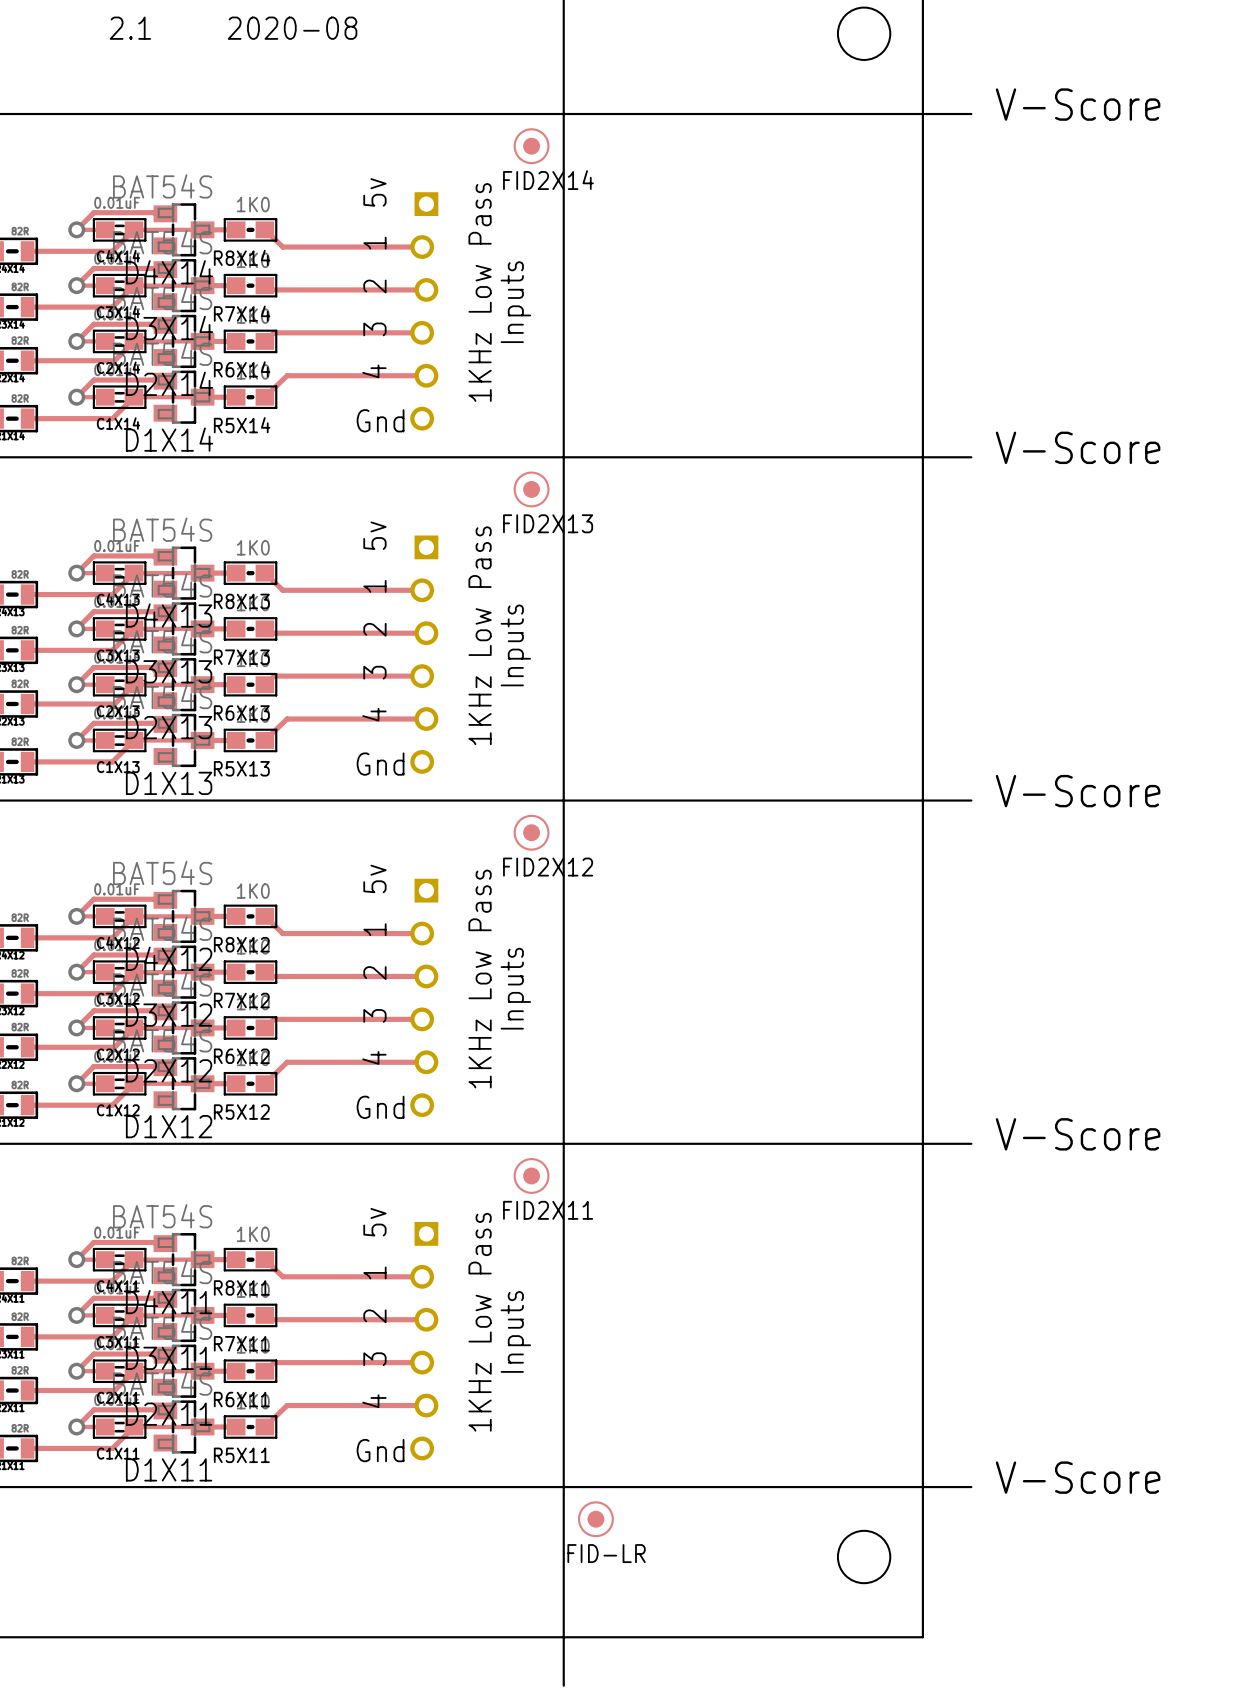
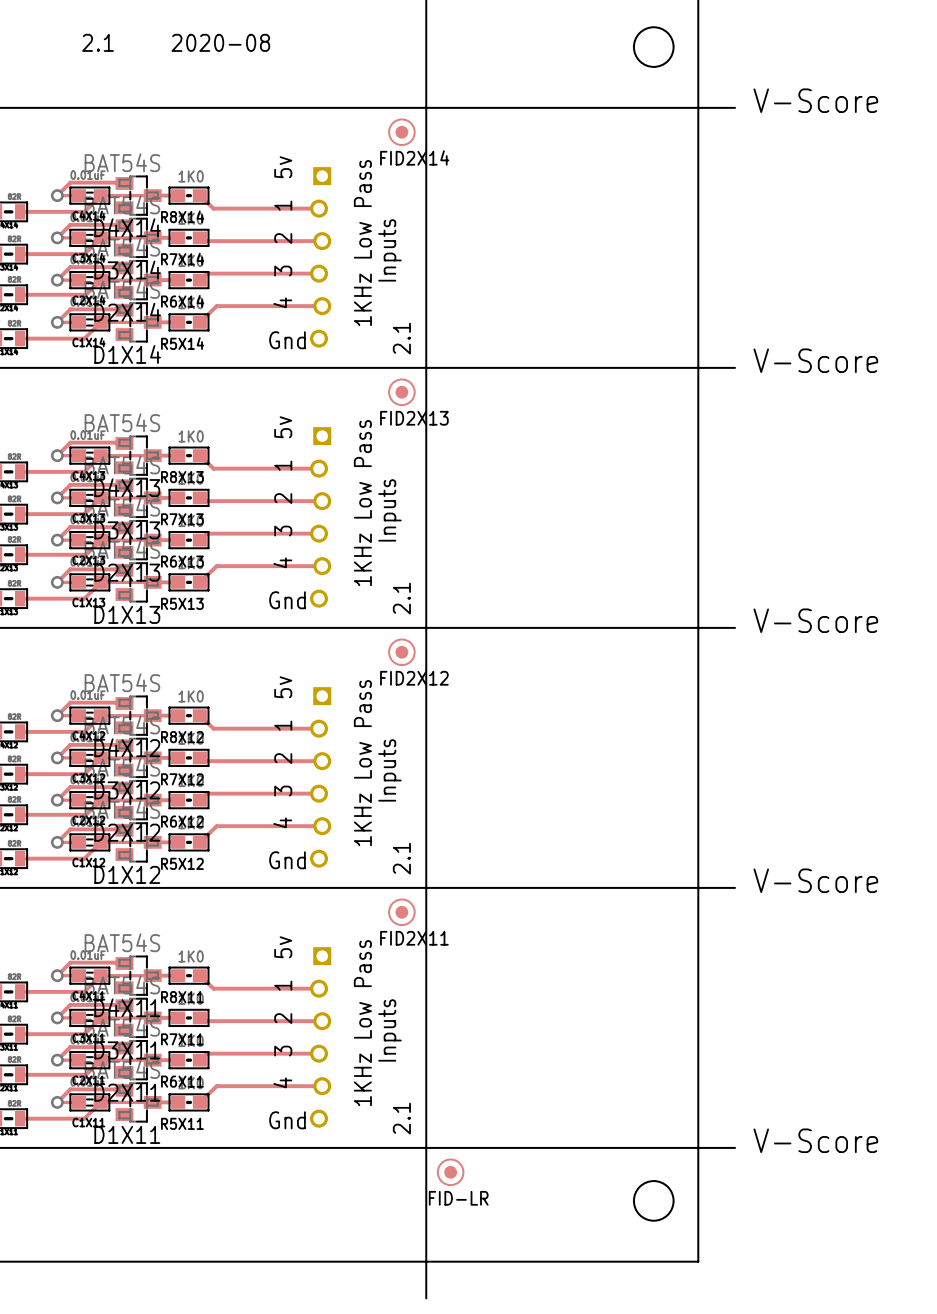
text: none -> 2.1 (401, 338)
text: none -> 2.1 (401, 598)
text: none -> 2.1 (401, 858)
text: none -> 2.1 (401, 1118)

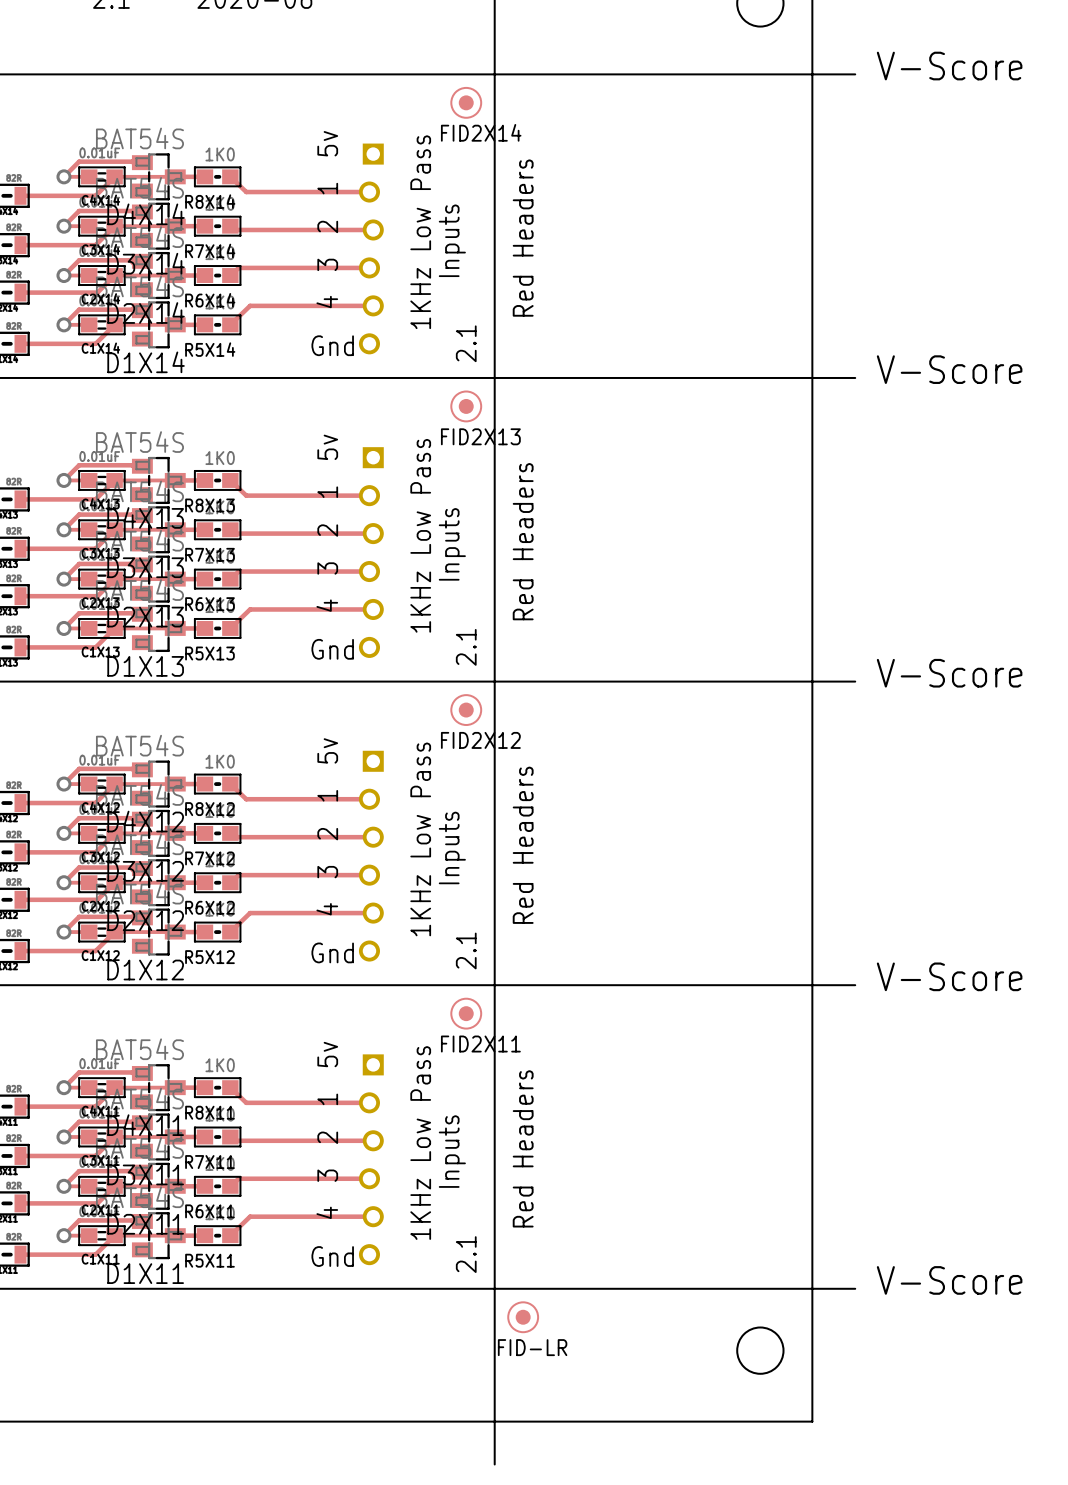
text: none -> Red Headers (523, 238)
text: none -> Red Headers (523, 541)
text: none -> Red Headers (523, 845)
text: none -> Red Headers (523, 1148)

